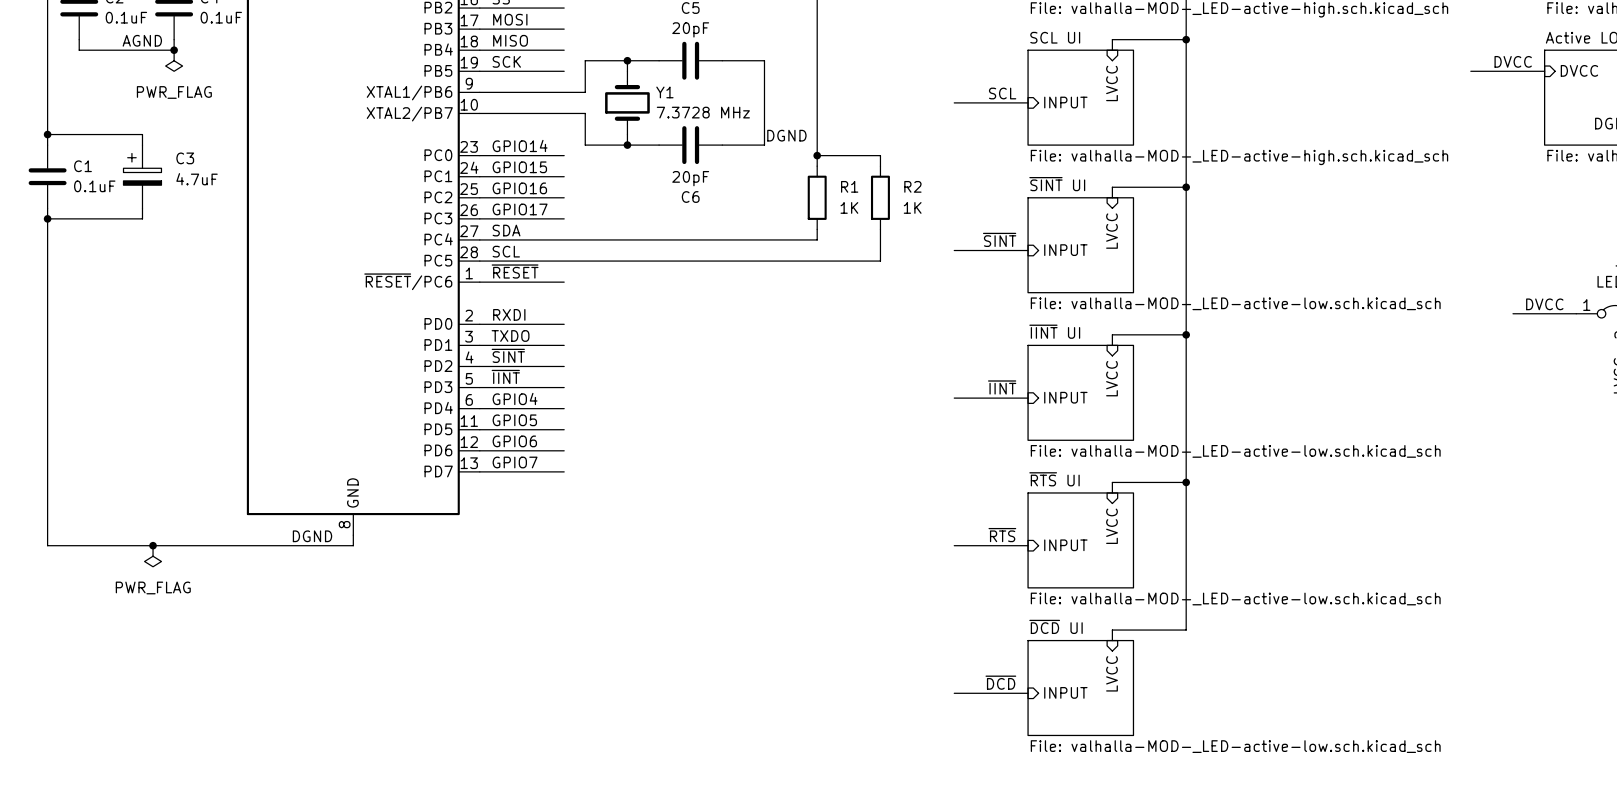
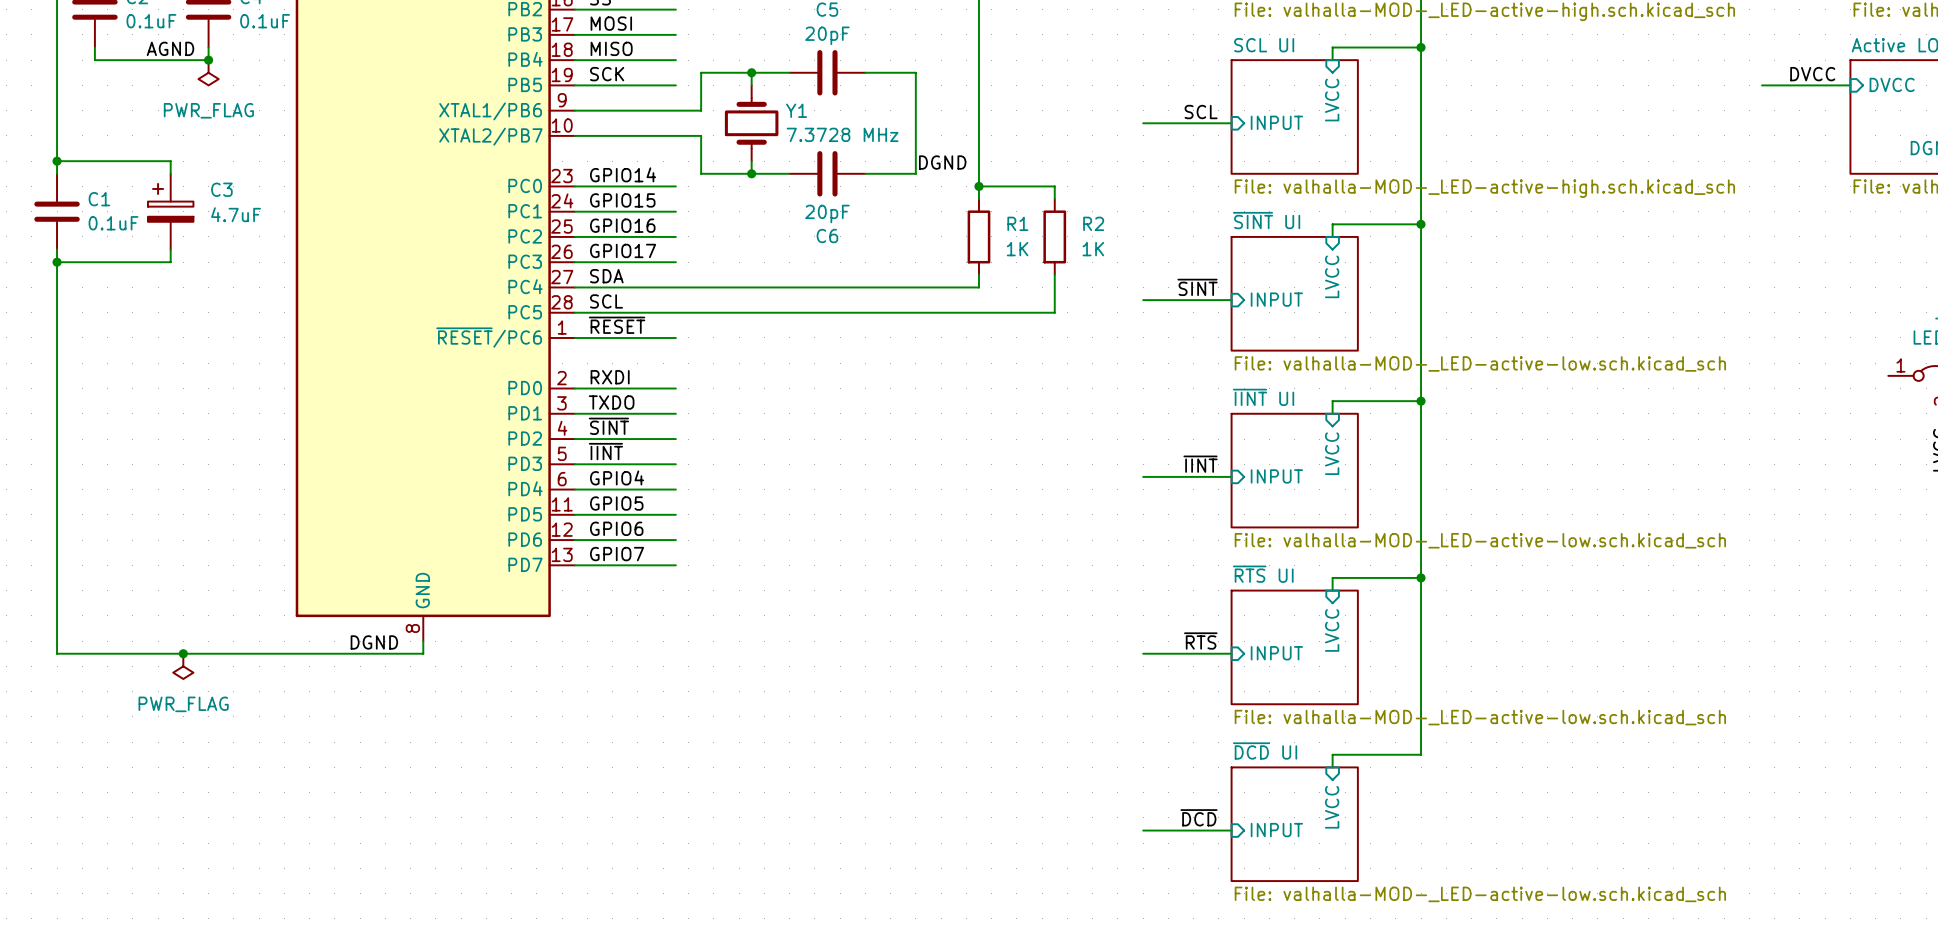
label: DVCC (1544, 304) -> none
wire: (1513, 313) (1576, 313) -> none

